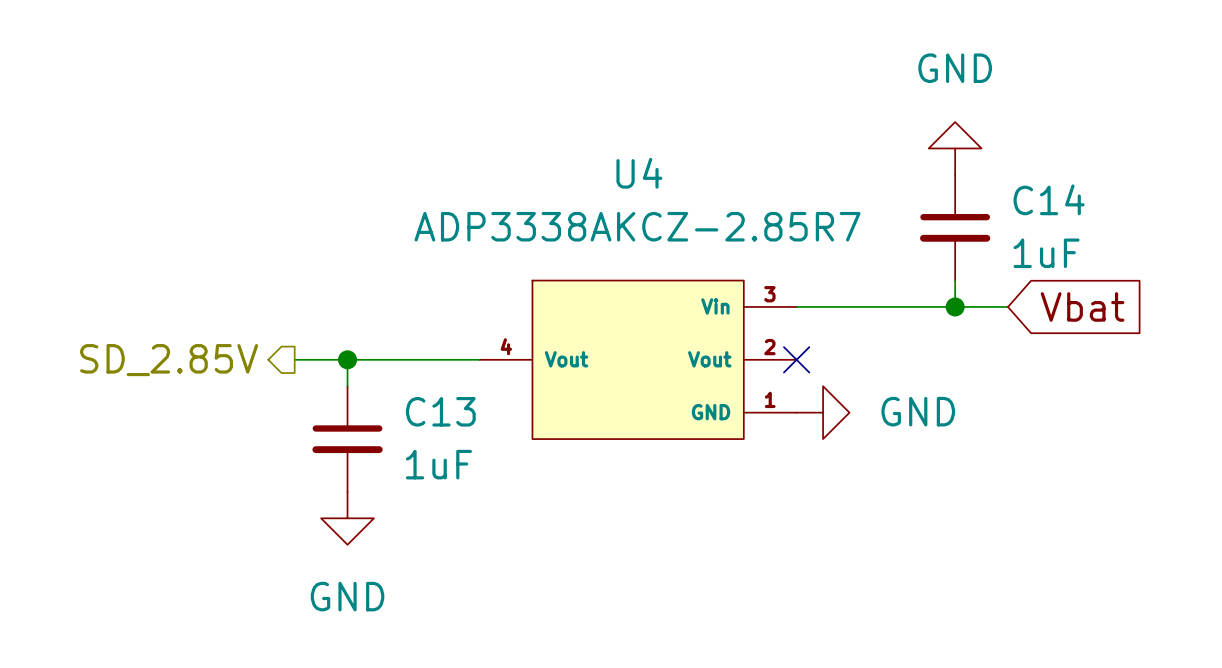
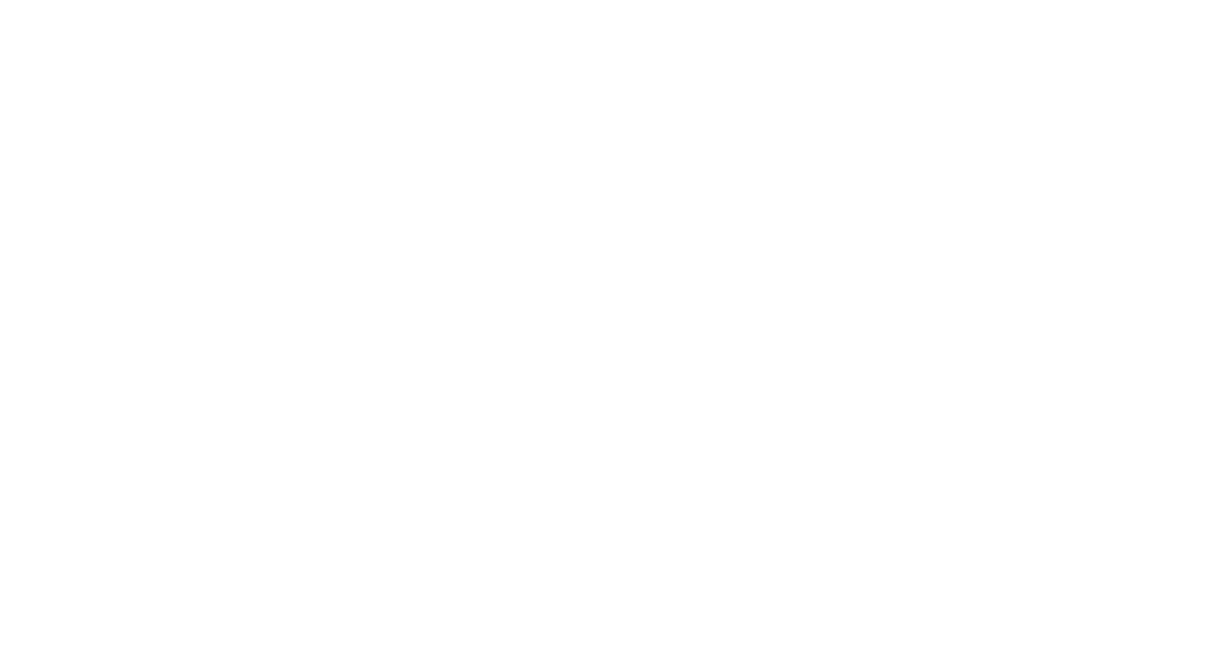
power symbol: GND (955, 148) -> none
C14: 1uF (955, 227) -> none
wire: (955, 280) (955, 306) -> none
wire: (796, 306) (1007, 306) -> none
junction: (955, 306) -> none
global label: Vbat (1082, 306) -> none
wire: (294, 359) (479, 359) -> none
wire: (347, 359) (347, 386) -> none
junction: (347, 359) -> none
U4: ADP3338AKCZ-2.85R7 (638, 359) -> none
no-connect mark: (796, 359) -> none
hierarchical label: SD_2.85V (169, 360) -> none
power symbol: GND (823, 412) -> none
C13: 1uF (347, 439) -> none
power symbol: GND (347, 518) -> none

